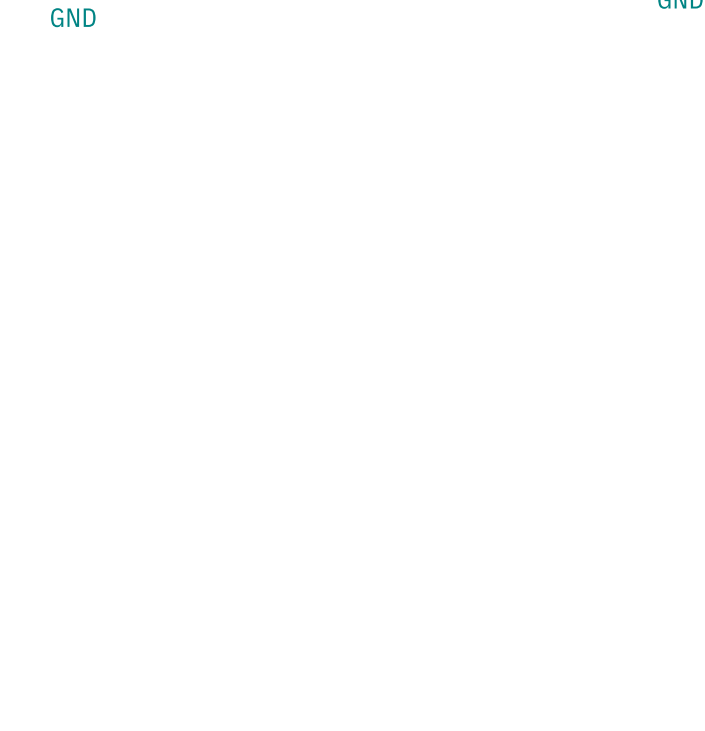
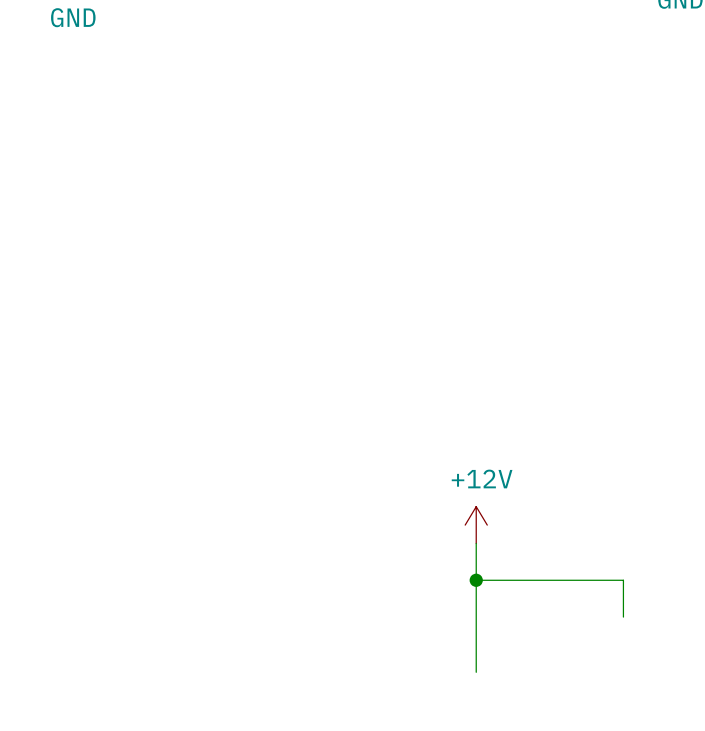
power symbol: none -> +12V (476, 525)
wire: none -> (476, 543) (476, 672)
wire: none -> (476, 580) (623, 580) (623, 617)
junction: none -> (476, 580)

